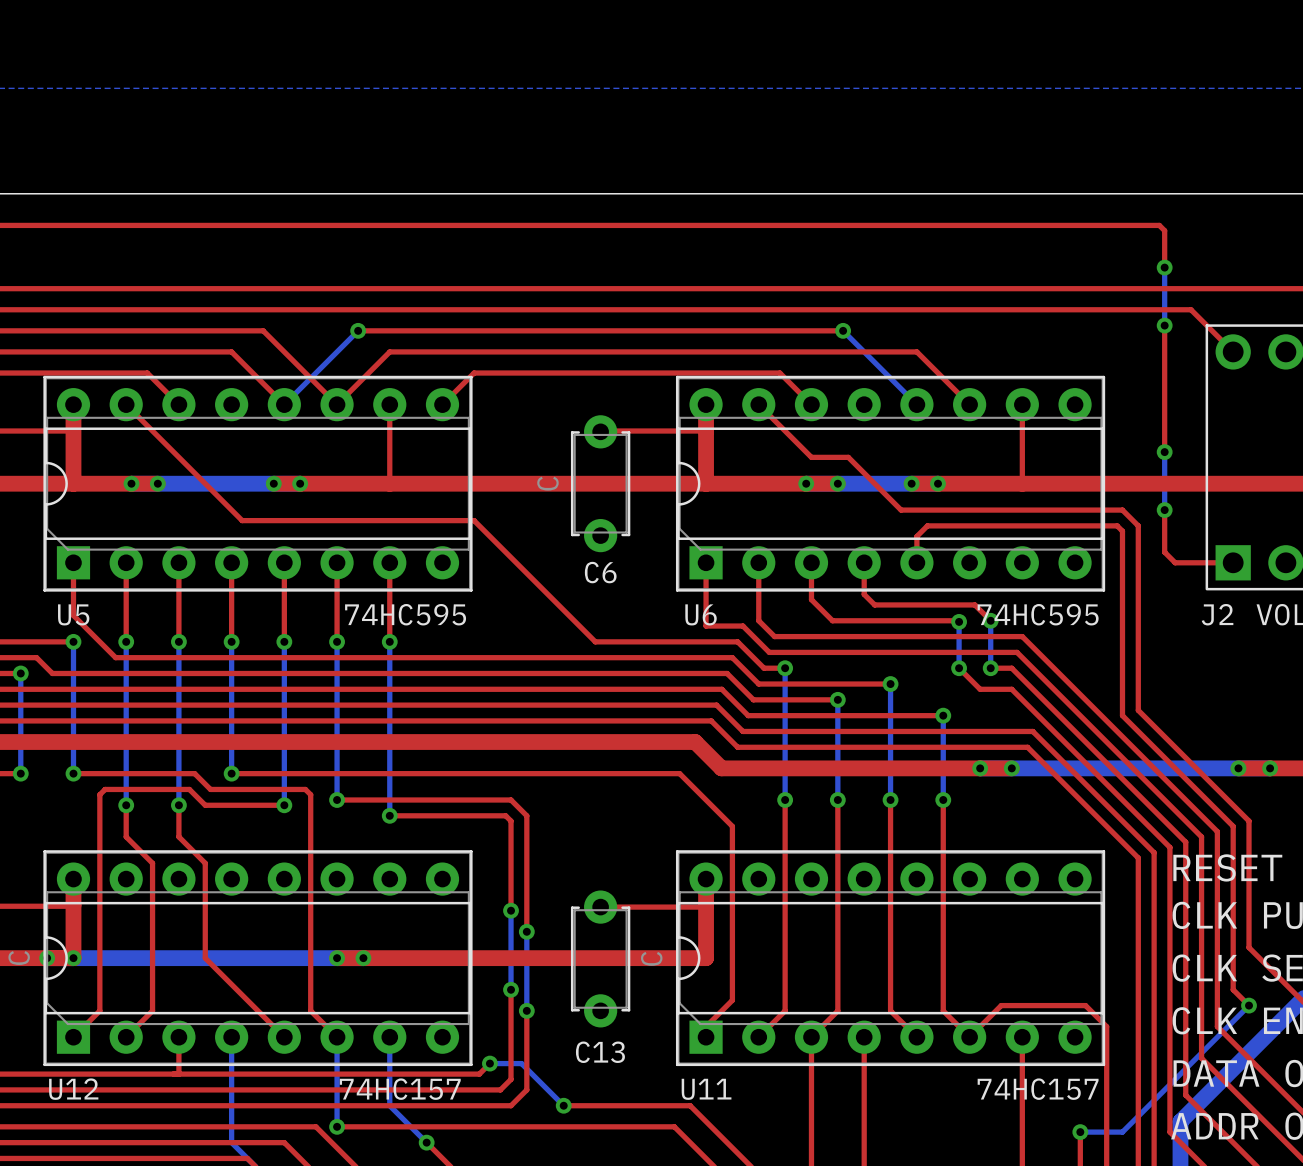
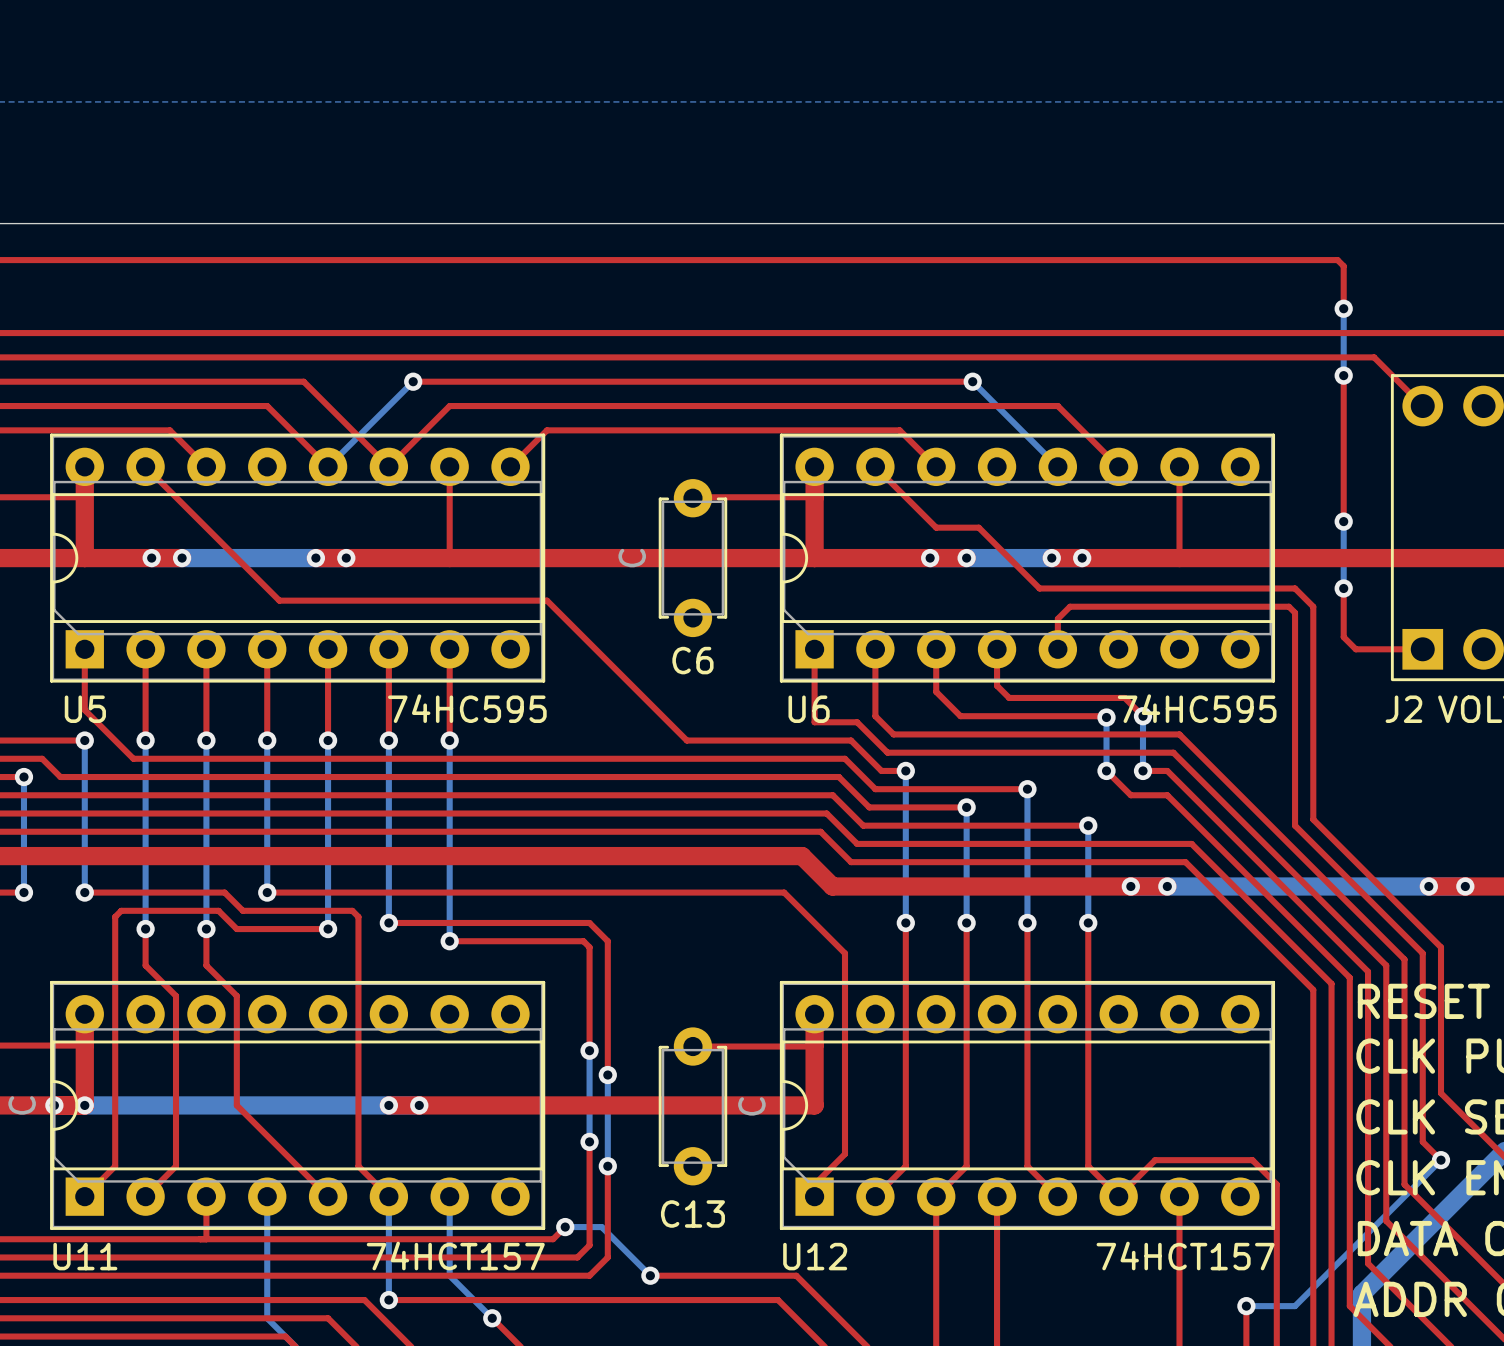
U12 name: U12 (73, 1089) -> U11 (85, 1256)
U12 value: 74HC157 (400, 1089) -> 74HCT157 (455, 1256)
U11 name: U11 (706, 1089) -> U12 (815, 1256)
U11 value: 74HC157 (1038, 1089) -> 74HCT157 (1185, 1256)

